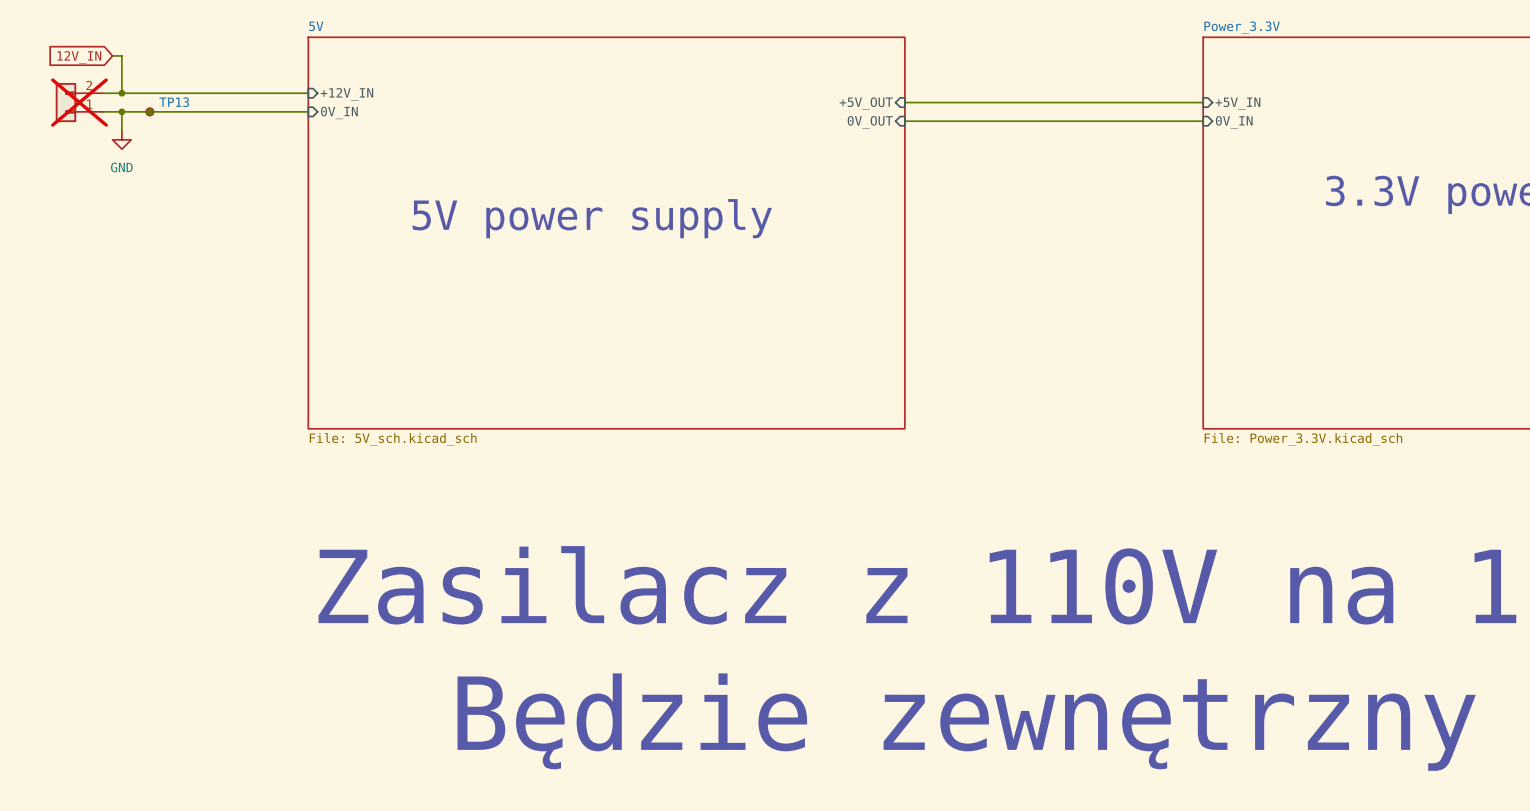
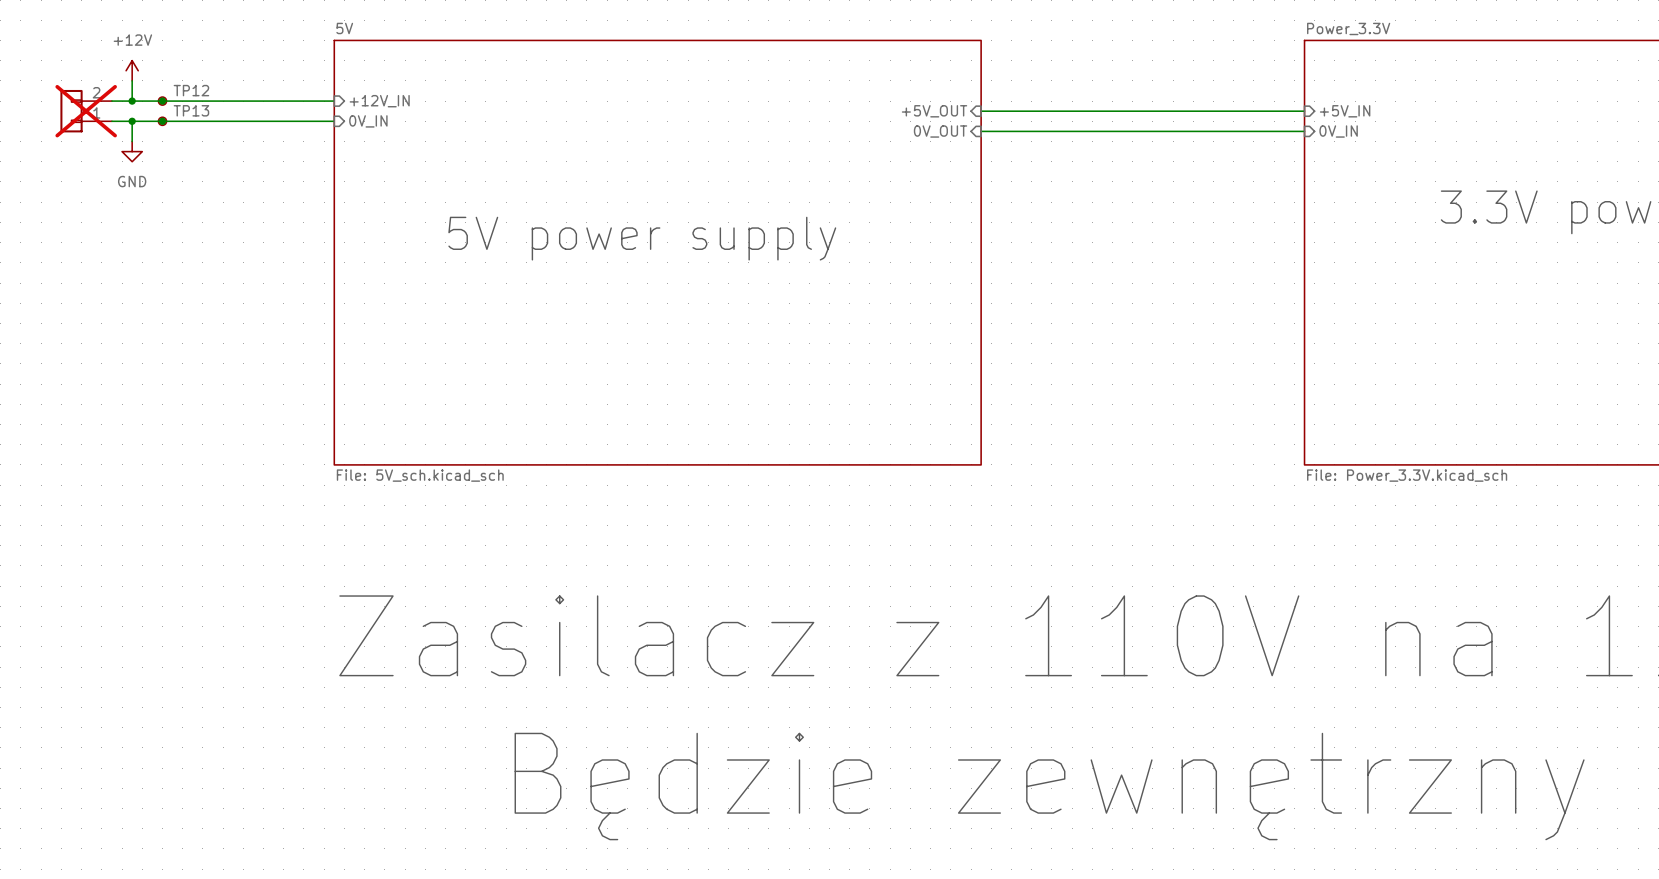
global label: 12V_IN (79, 57) -> none
power symbol: none -> +12V (132, 70)
junction: none -> (162, 101)
TP12: none -> (162, 101)

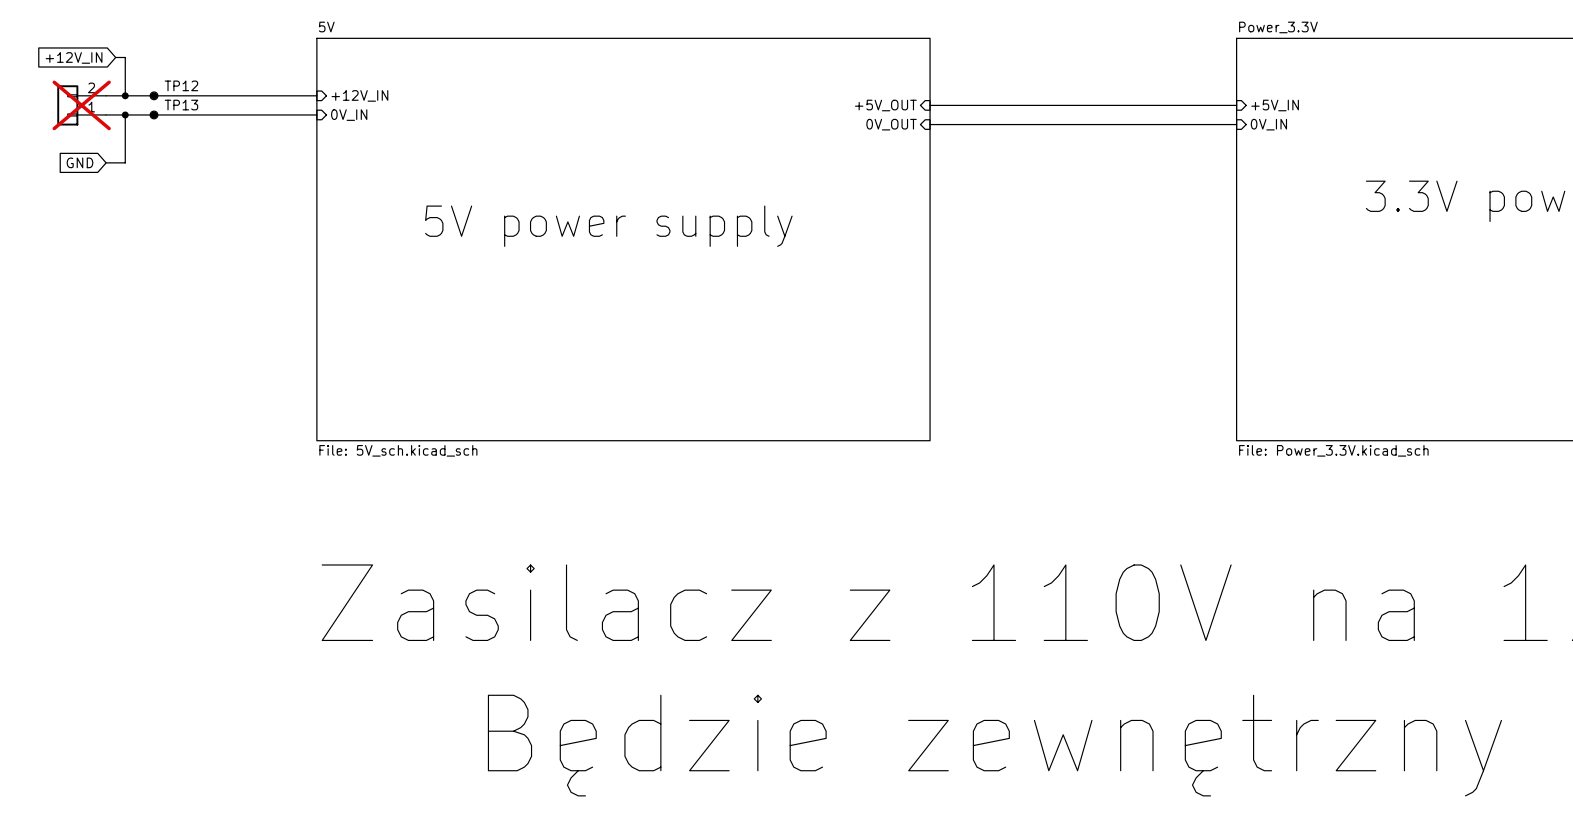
global label: none -> +12V_IN (74, 57)
power symbol: +12V (132, 70) -> none
wire: none -> (125, 134) (125, 162) (106, 162)
power symbol: GND (132, 151) -> none
global label: none -> GND (79, 162)

